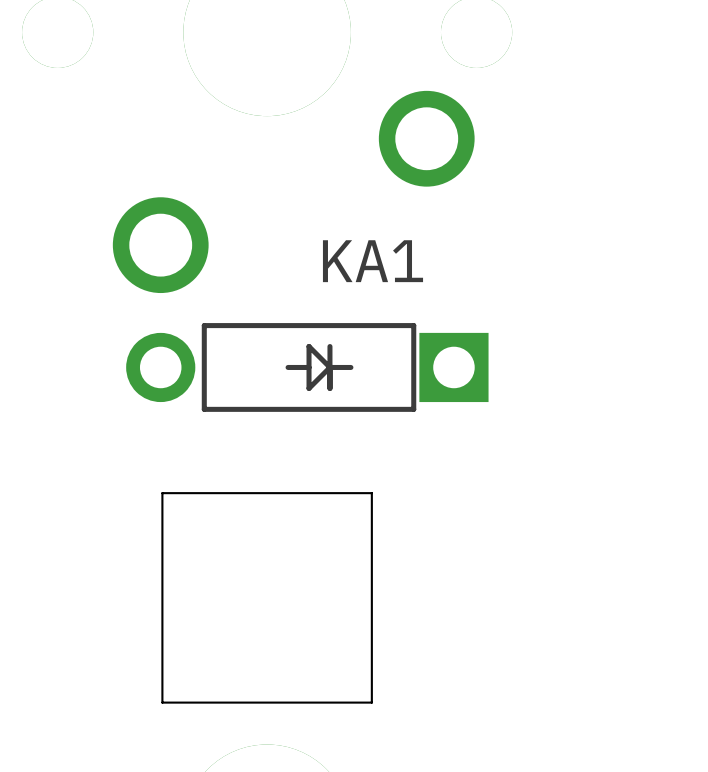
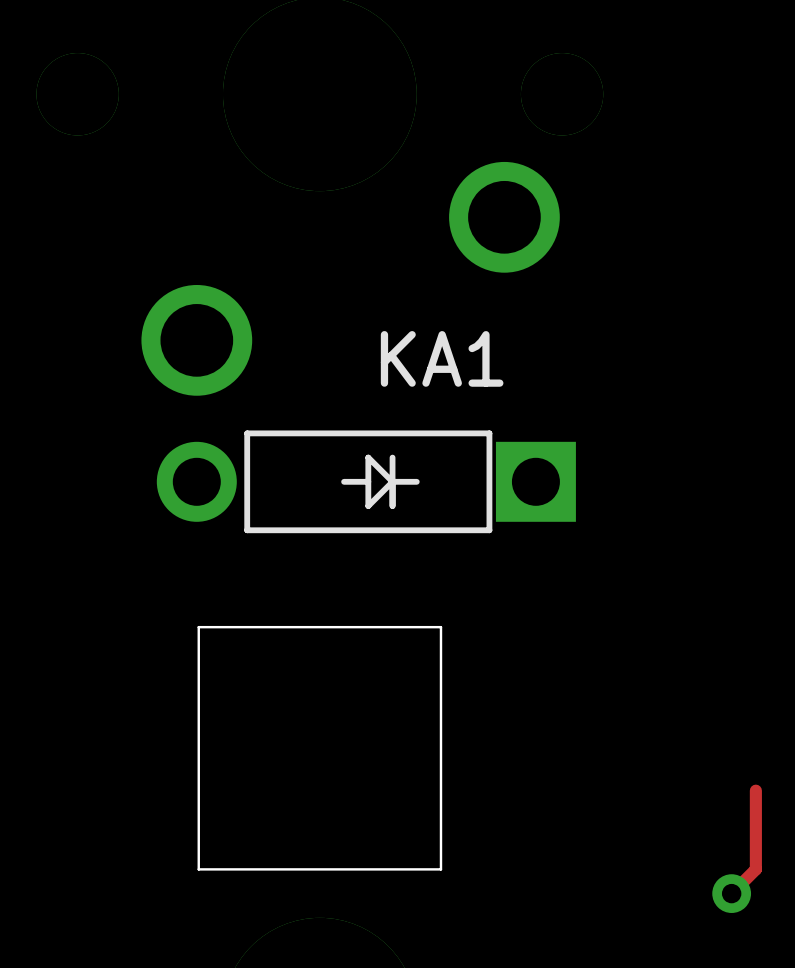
track: none -> (755, 790) (755, 869) (731, 893)
via: none -> (731, 893)

